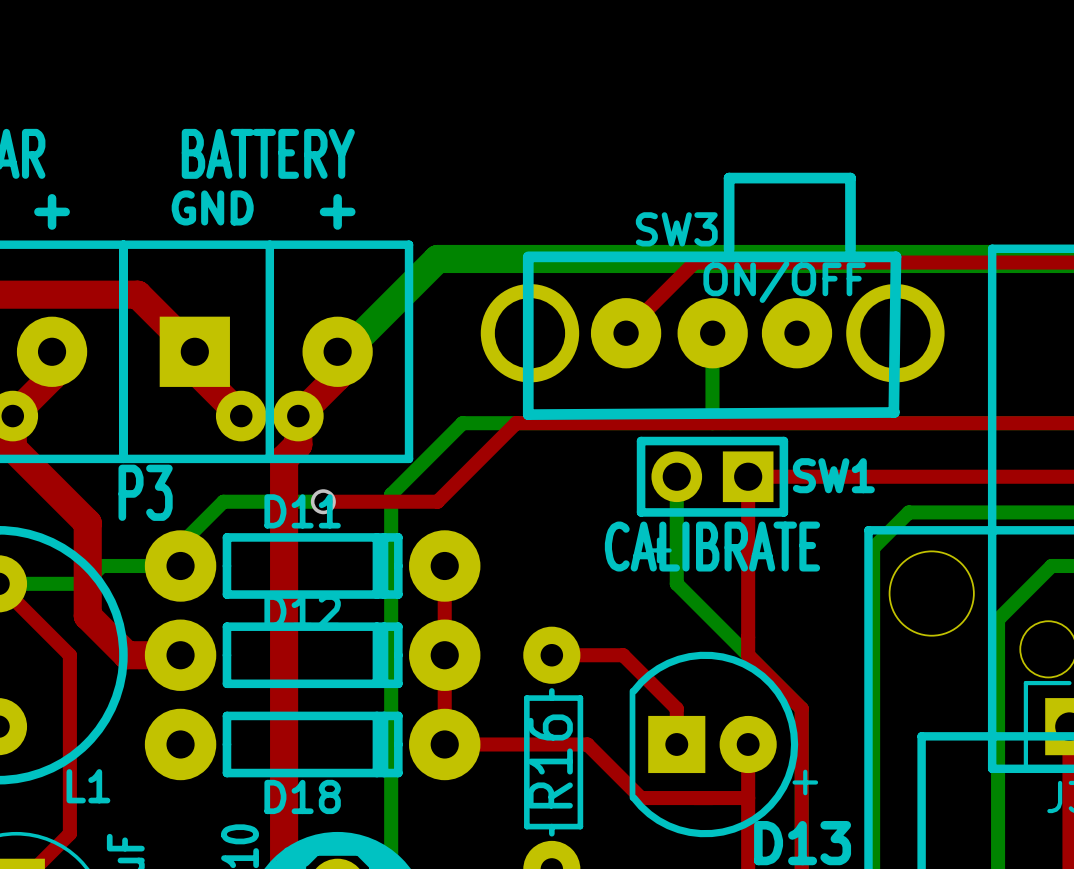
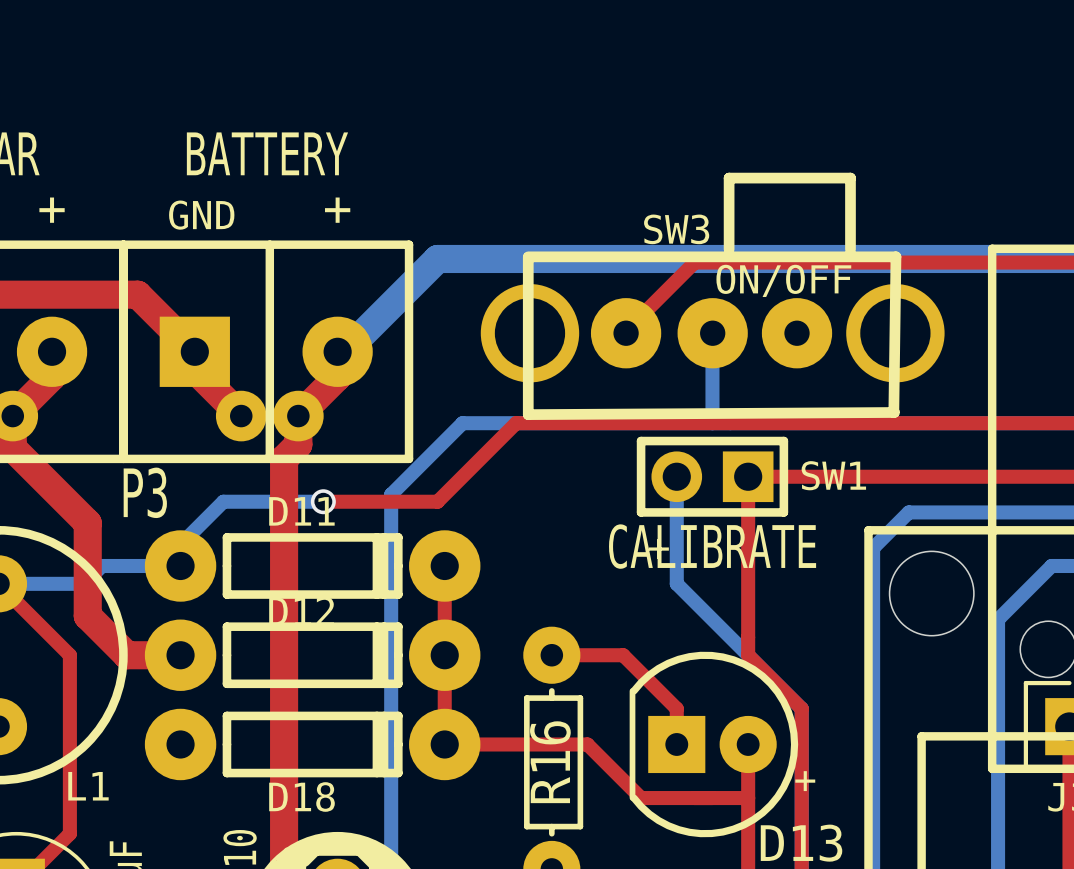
part text position: GND (212, 207) -> GND (201, 215)

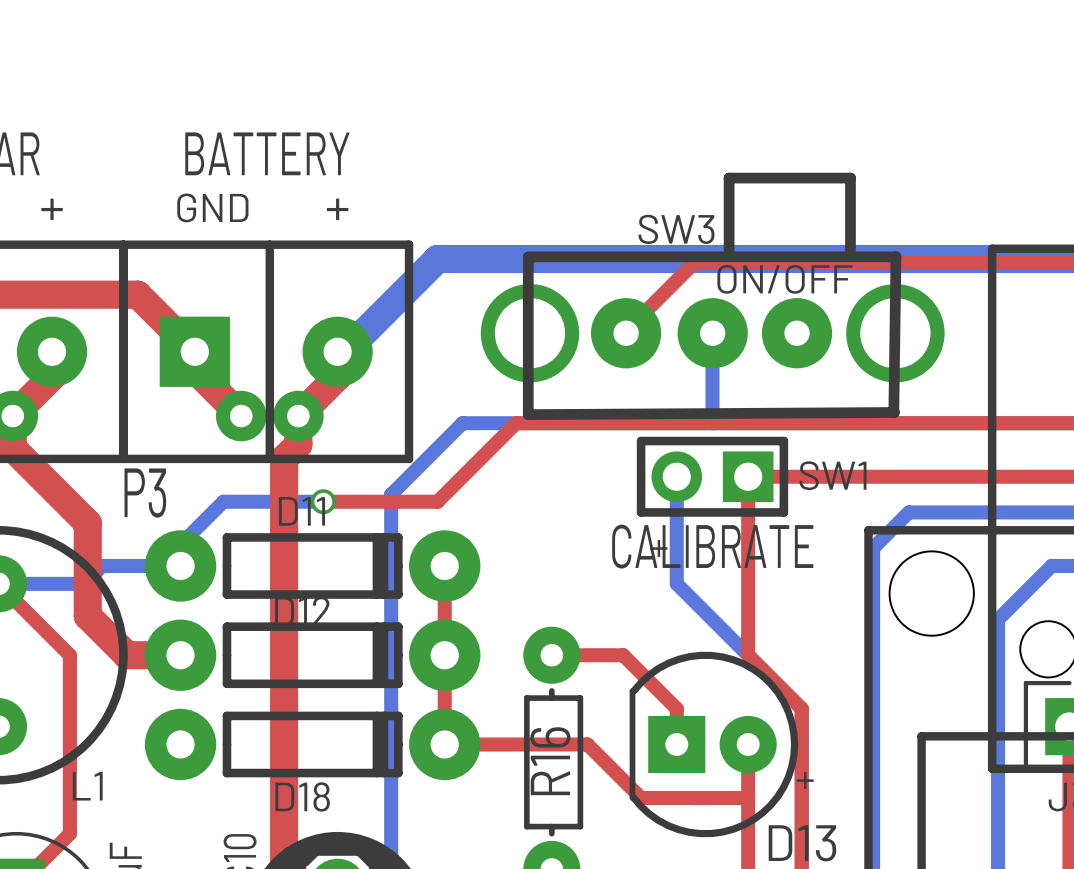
part text position: GND (201, 215) -> GND (212, 207)

